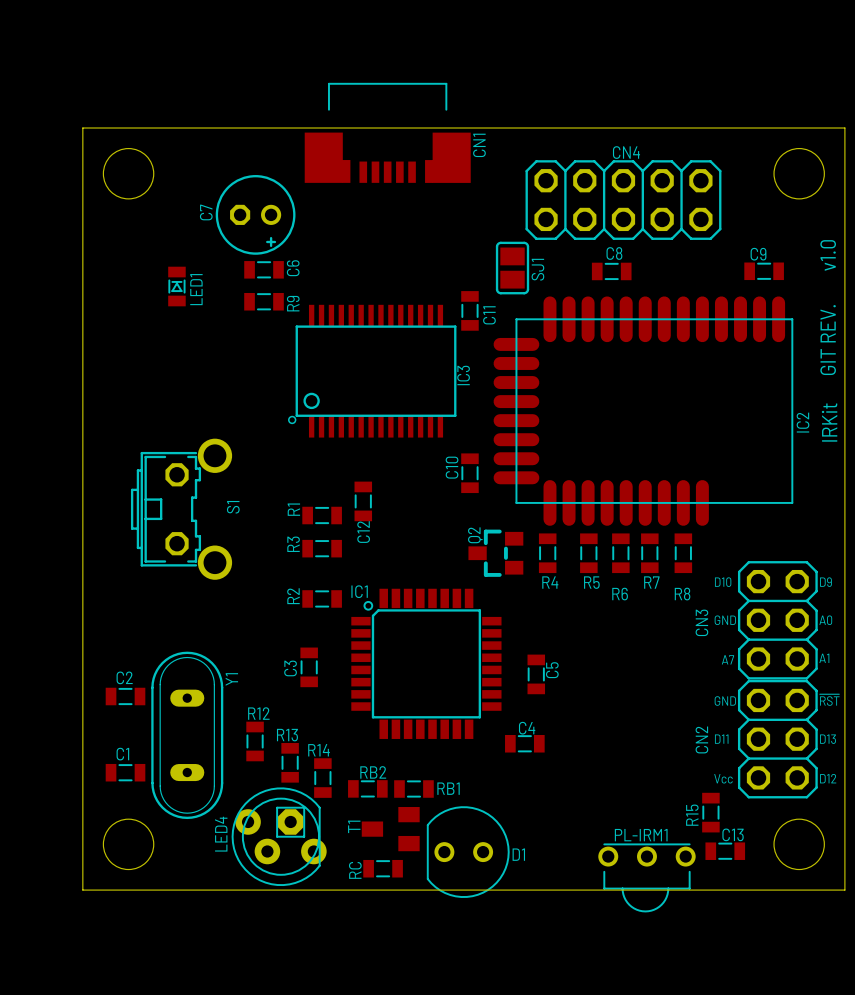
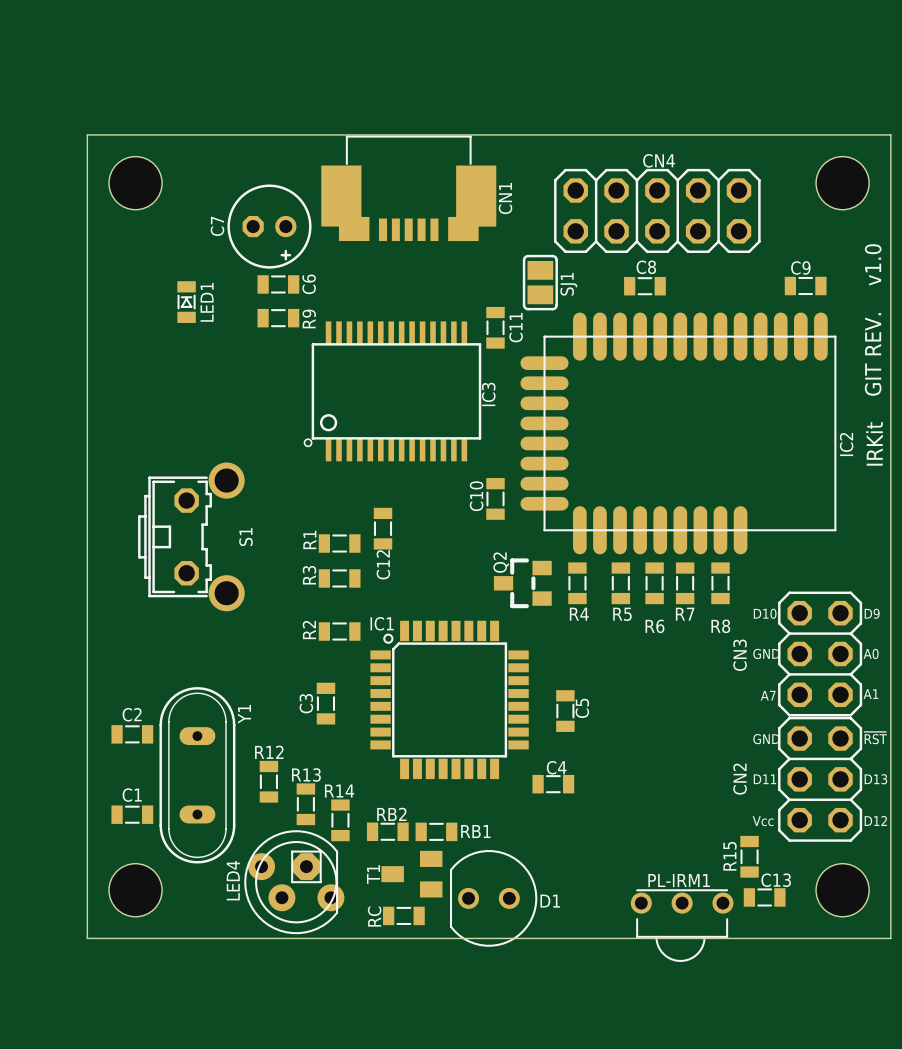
CN1 footprint: [304, 82, 471, 183] -> [321, 135, 497, 242]

